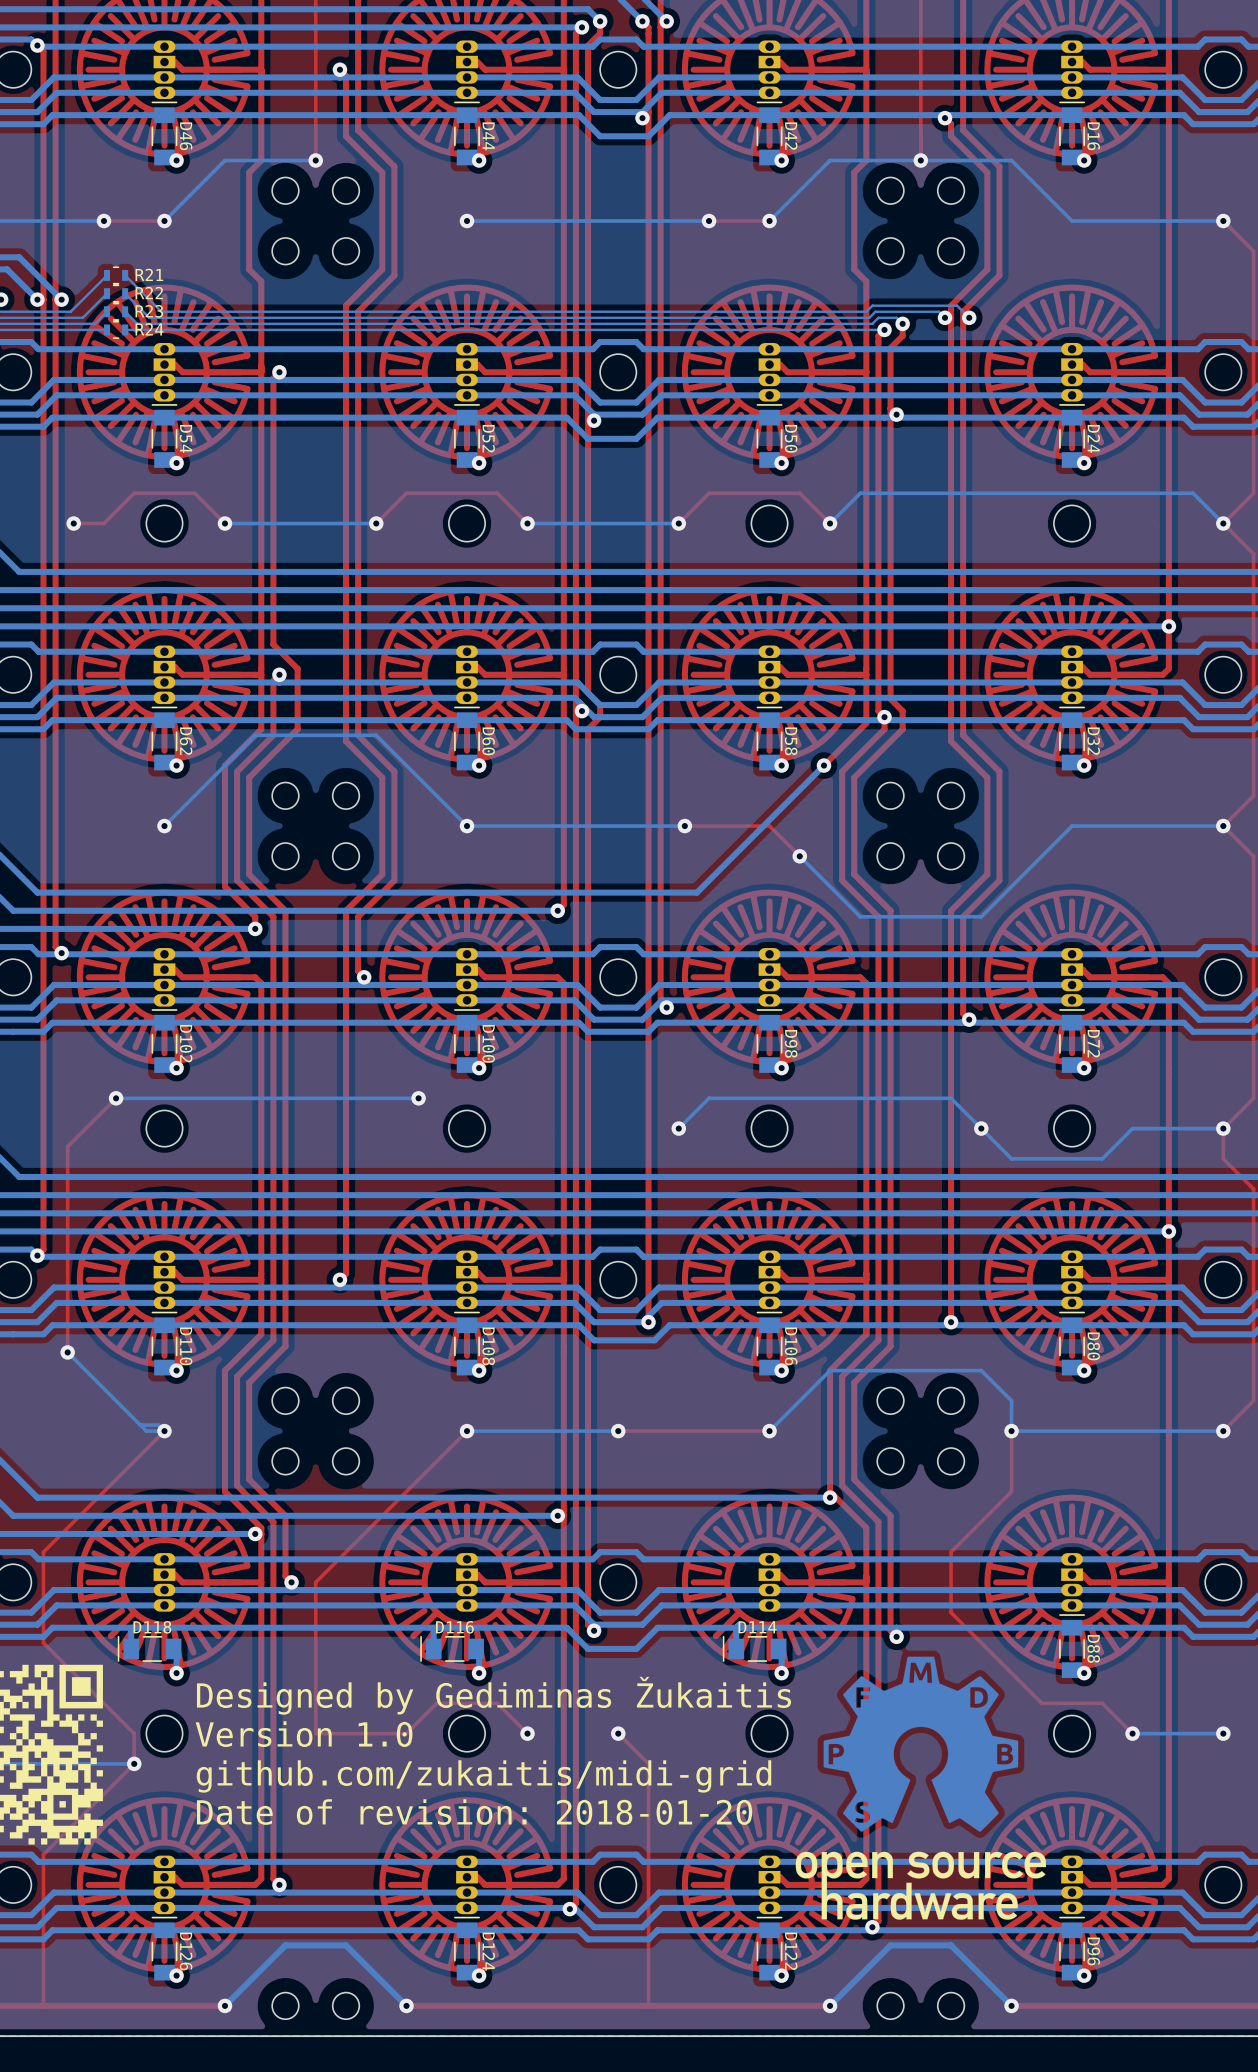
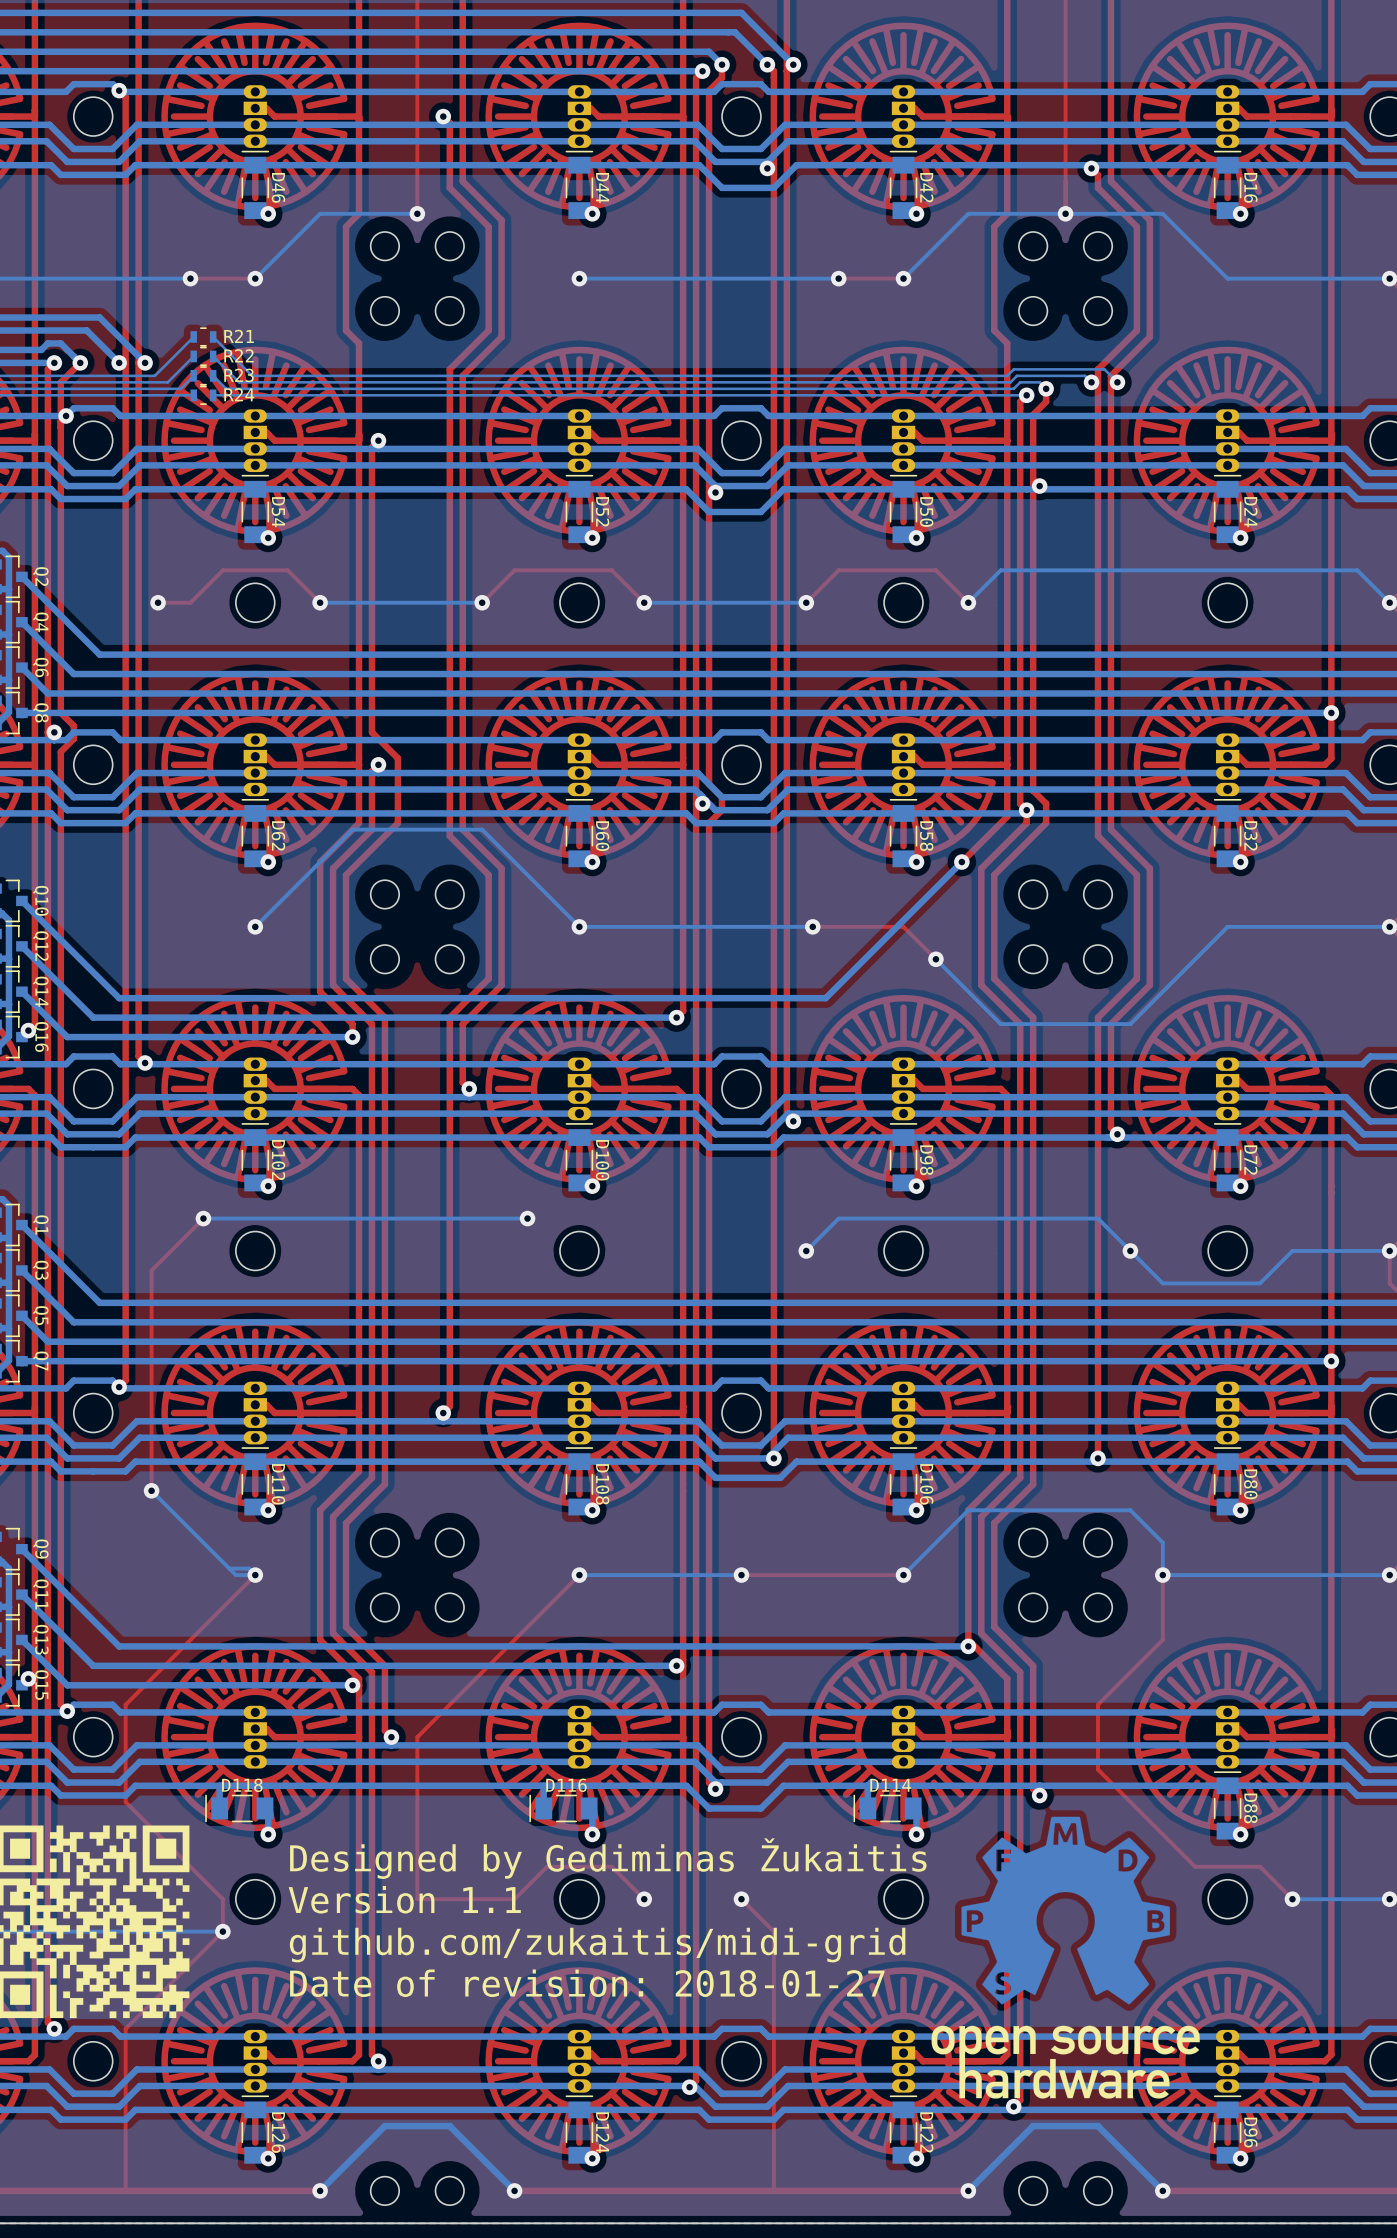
text: Version 1.0 (304, 1734) -> Version 1.1 (404, 1899)
text: Date of revision: 2018-01-20 (474, 1812) -> Date of revision: 2018-01-27 (587, 1983)

